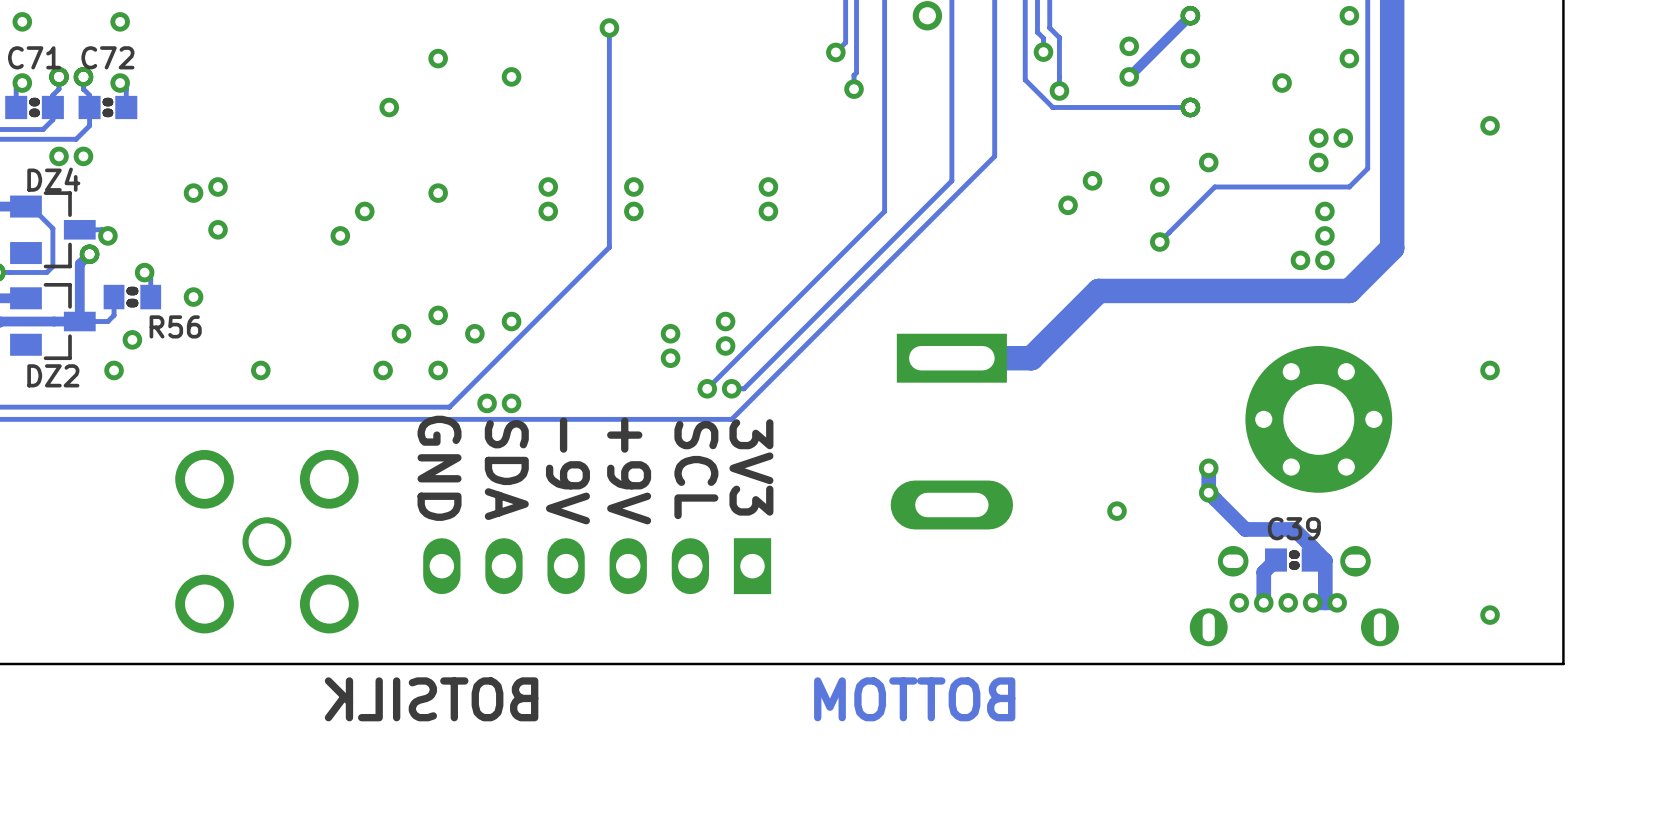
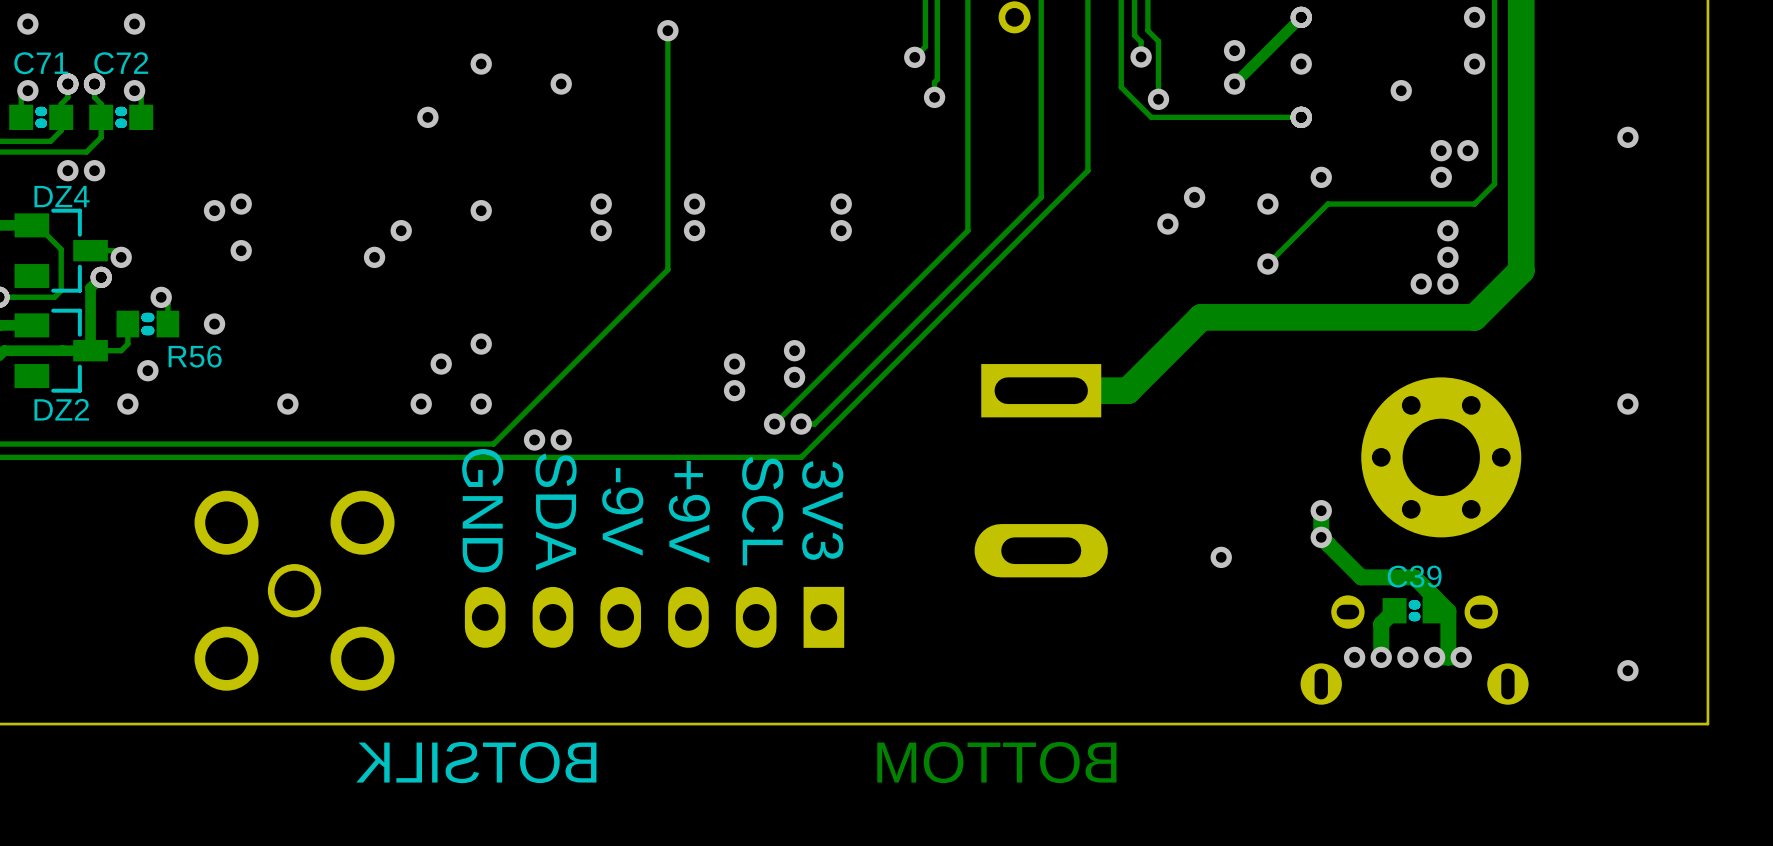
via: (511, 321) -> none
via: (474, 333) -> none

